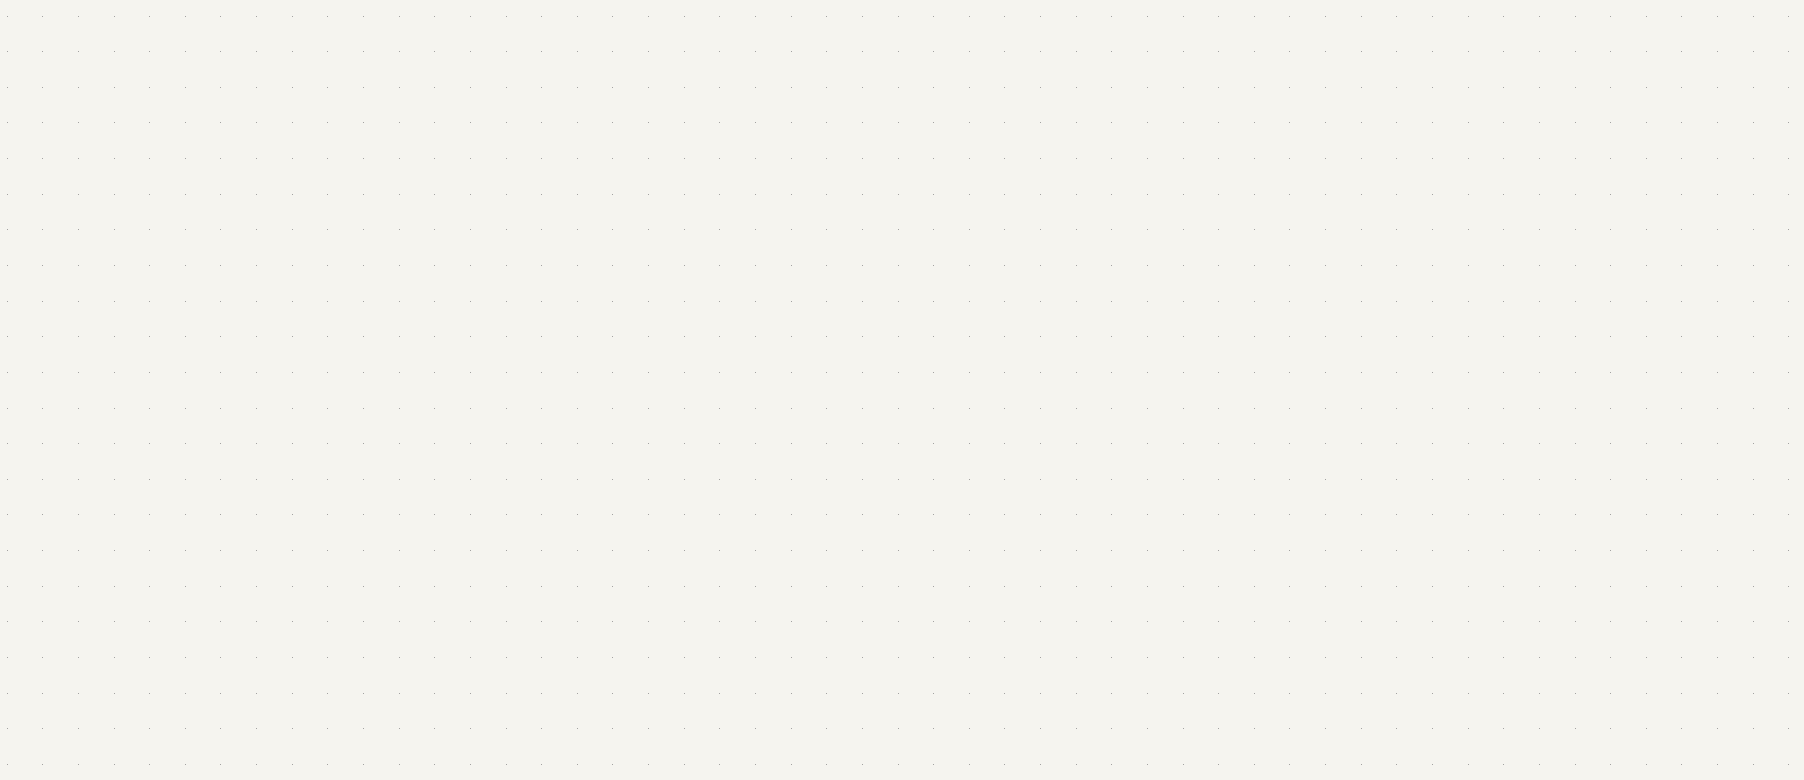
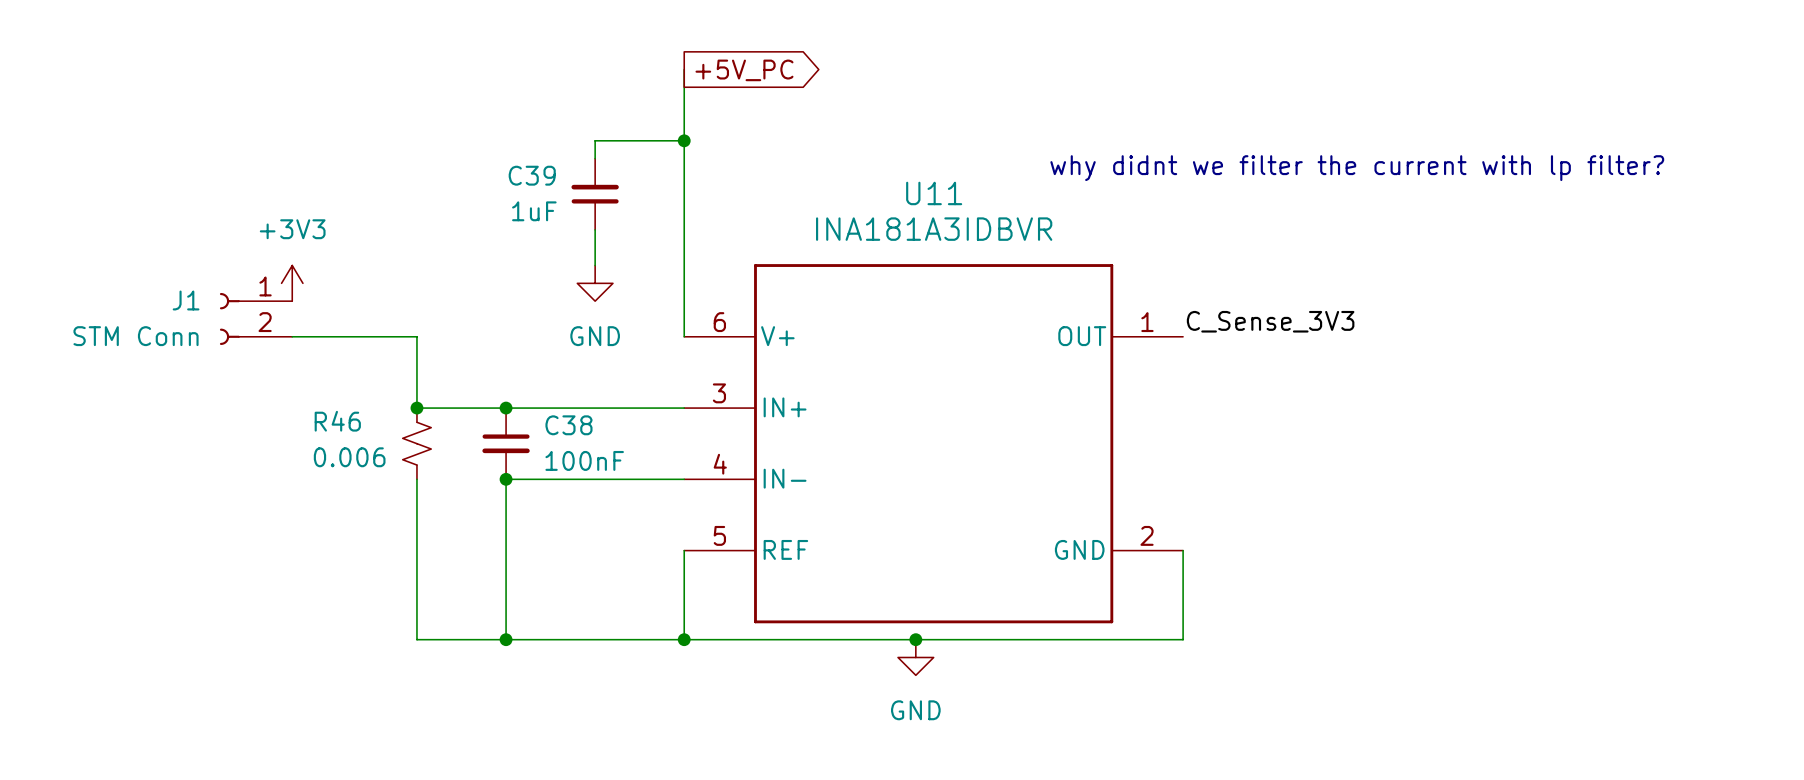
wire: none -> (684, 69) (684, 336)
global label: none -> +5V_PC (744, 70)
wire: none -> (684, 140) (595, 140) (595, 158)
junction: none -> (684, 140)
text: none -> why didnt we filter the current with lp filter? (1357, 168)
C39: none -> 1uF (595, 194)
wire: none -> (595, 229) (595, 265)
power symbol: none -> +3V3 (292, 283)
power symbol: none -> GND (595, 283)
J1: none -> STM Conn (256, 318)
label: none -> C_Sense_3V3 (1270, 321)
wire: none -> (292, 336) (416, 336) (416, 408) (684, 408)
junction: none -> (416, 408)
junction: none -> (506, 408)
R46: none -> 0.006 (416, 443)
C38: none -> 100nF (506, 443)
U11: none -> INA181A3IDBVR (933, 443)
wire: none -> (416, 479) (416, 639) (1183, 639) (1183, 550)
junction: none -> (506, 479)
wire: none -> (684, 479) (506, 479) (506, 639)
wire: none -> (684, 550) (684, 639)
junction: none -> (506, 639)
junction: none -> (684, 639)
junction: none -> (915, 639)
power symbol: none -> GND (915, 657)

